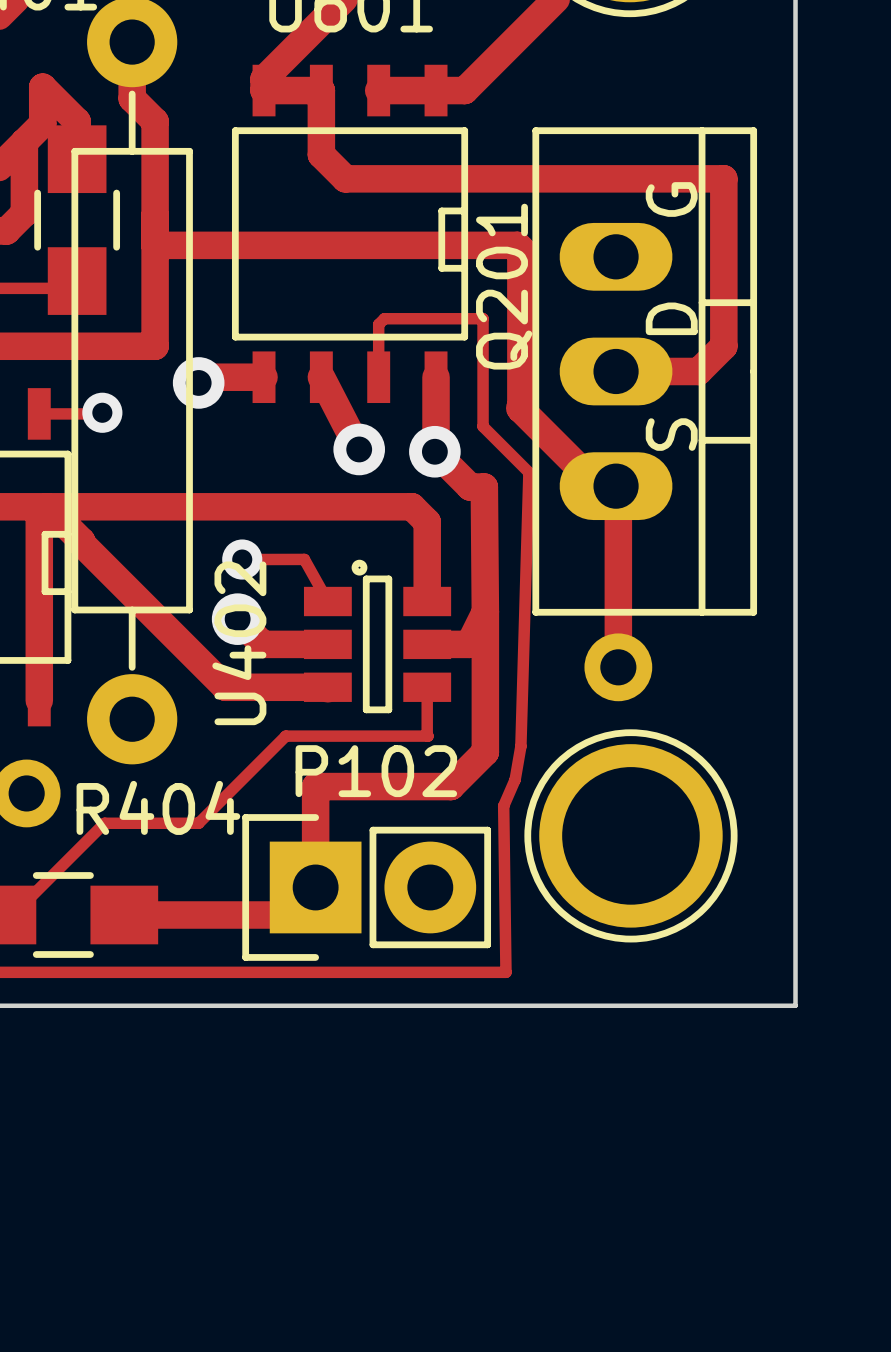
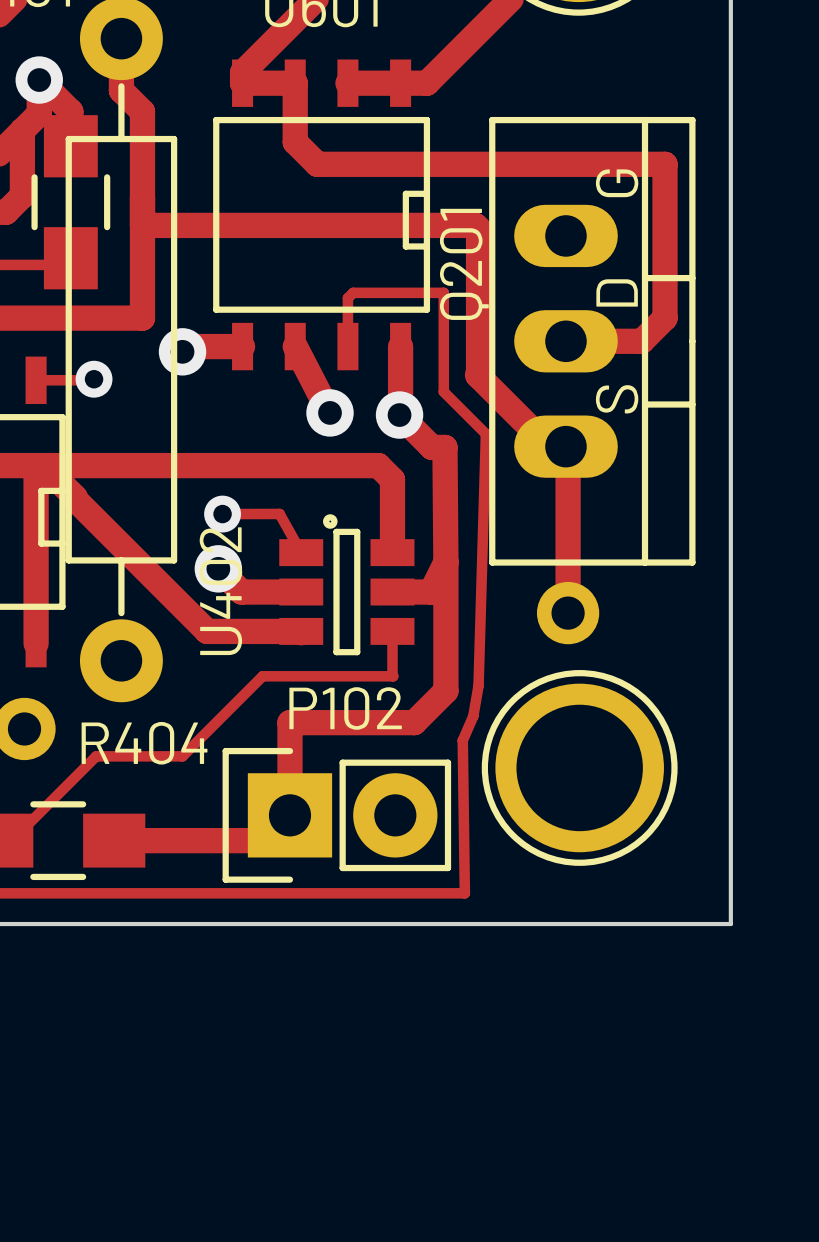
via: none -> (39, 80)

